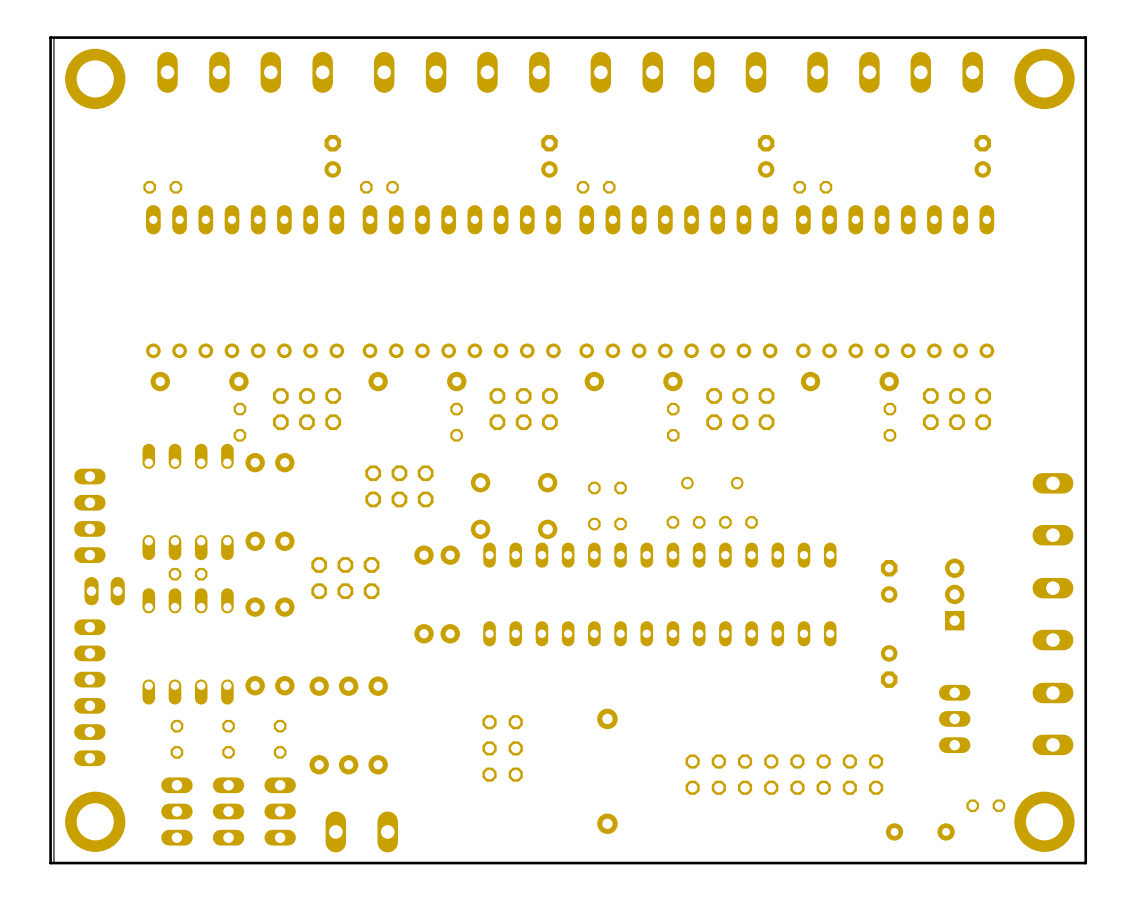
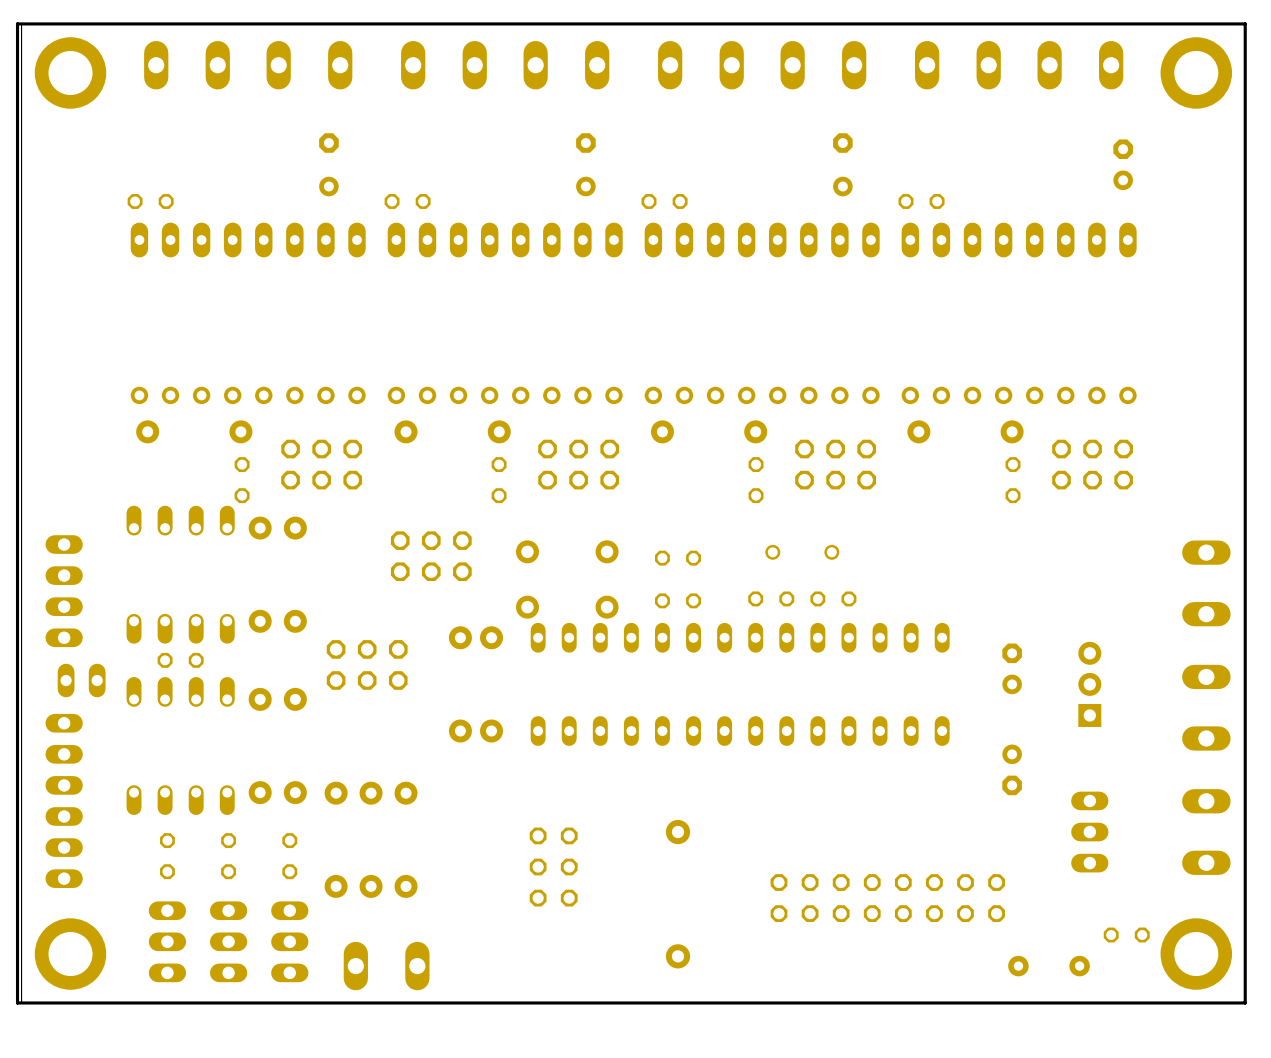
part: none -> (328, 164)
part: (332, 156) -> none
part: none -> (585, 164)
part: (549, 156) -> none
part: none -> (842, 164)
part: (766, 156) -> none

